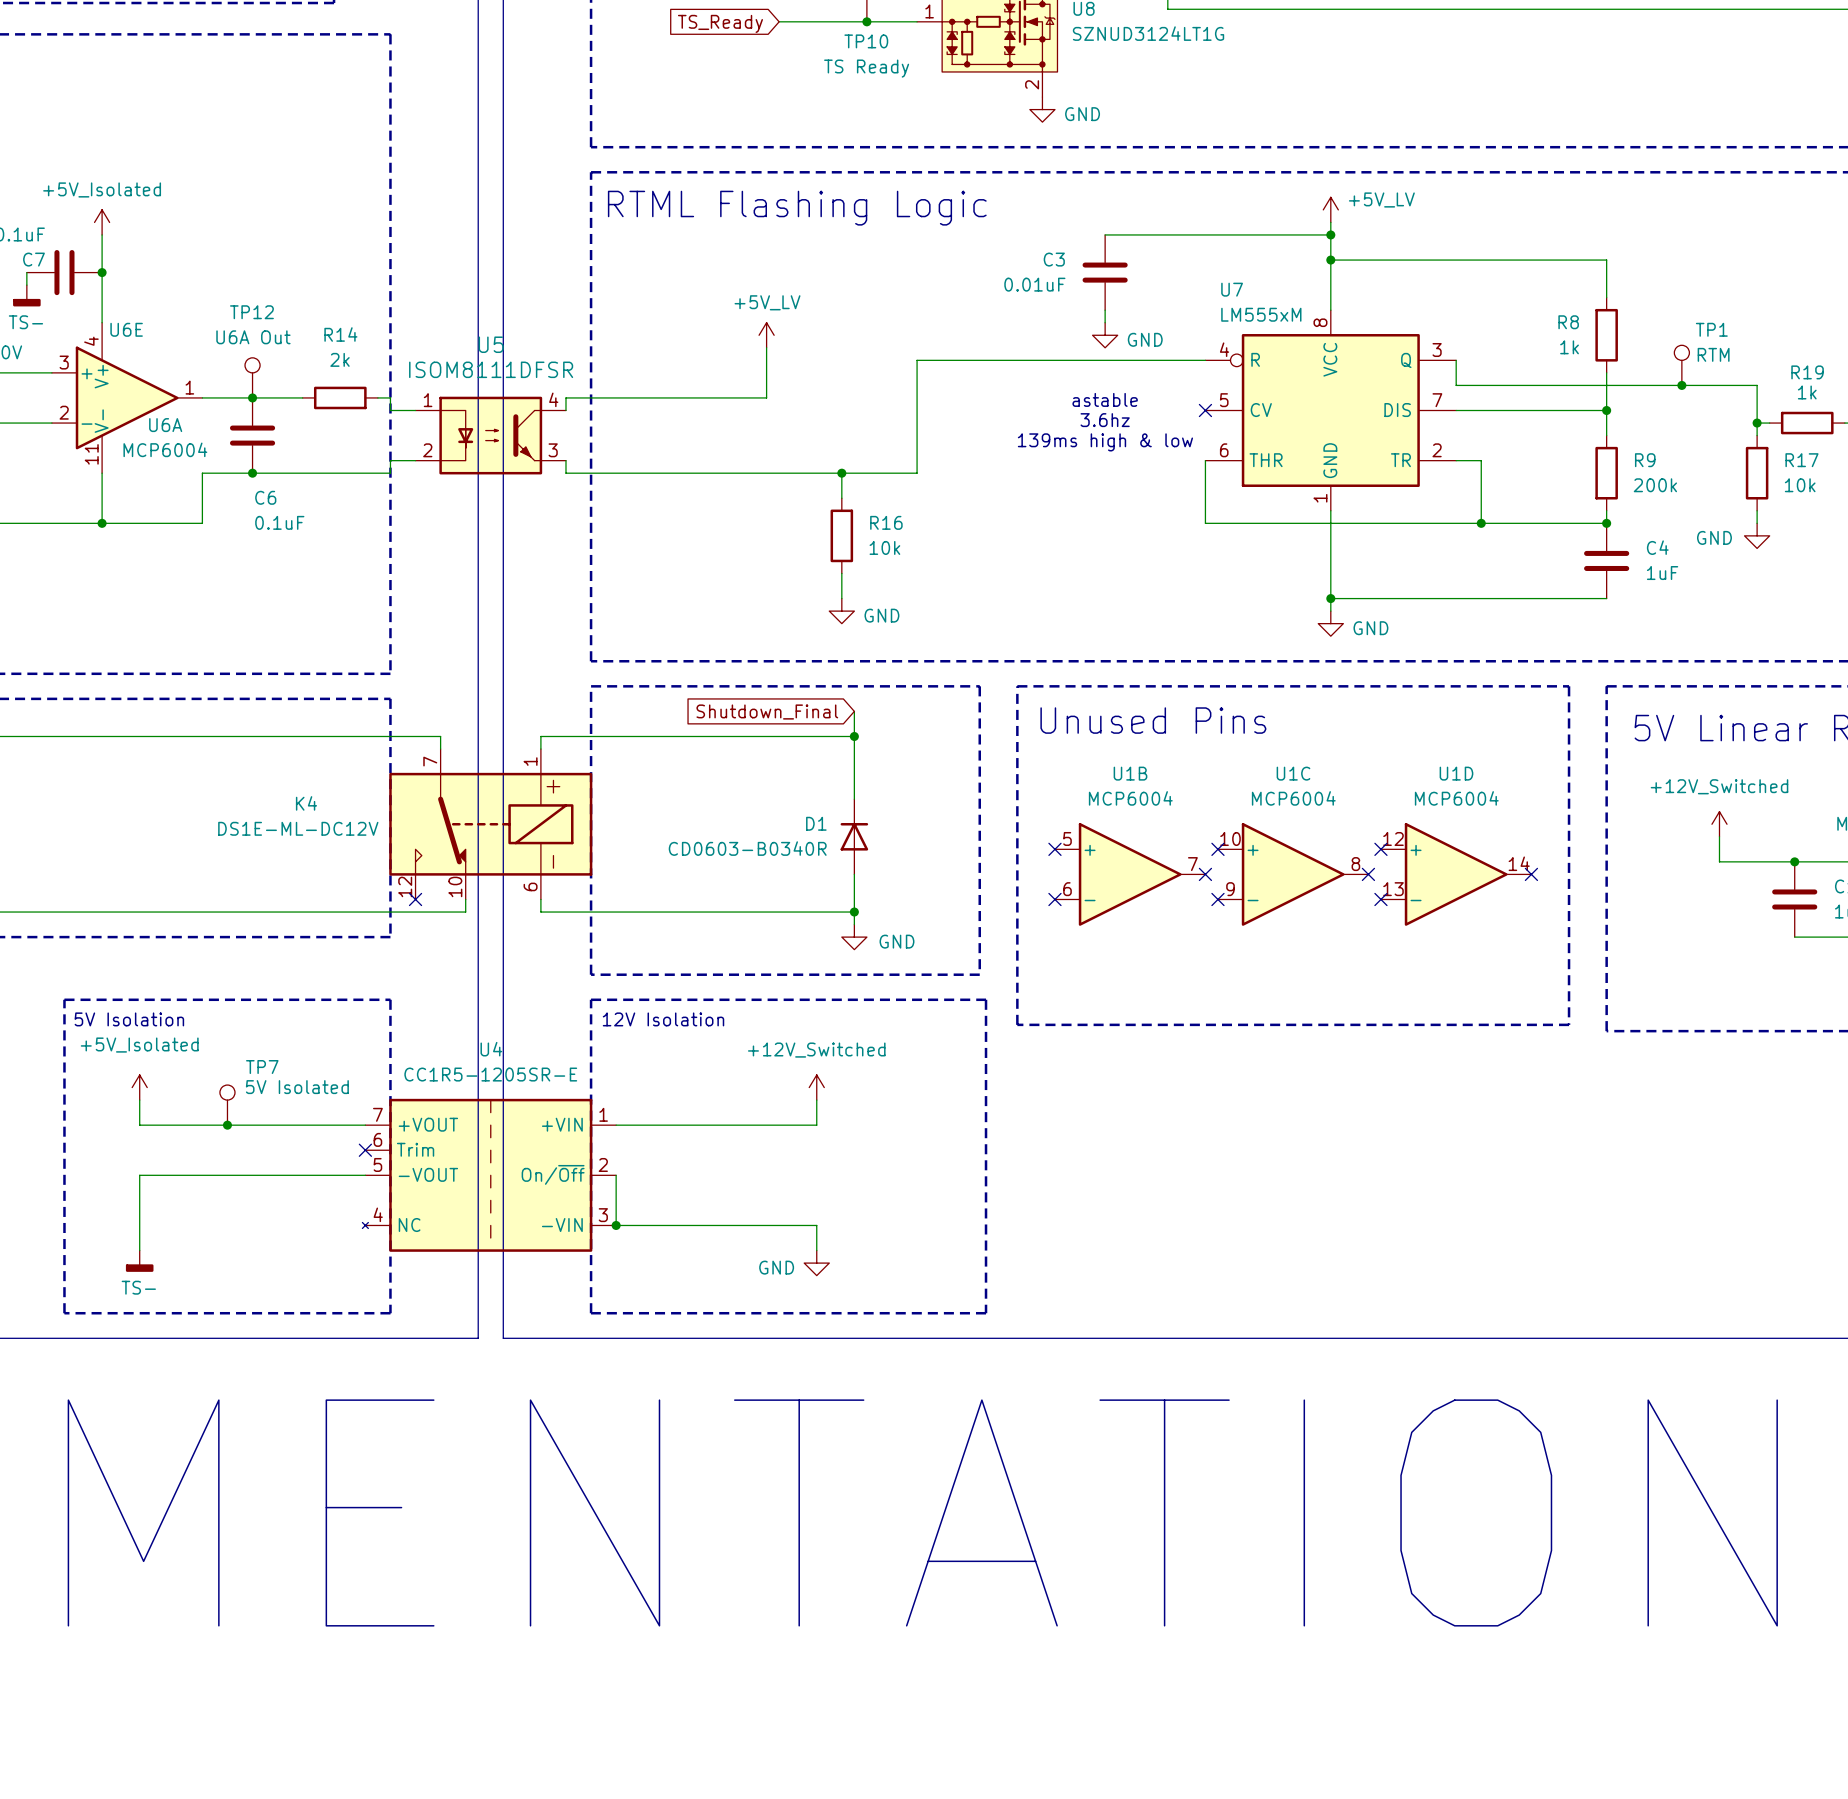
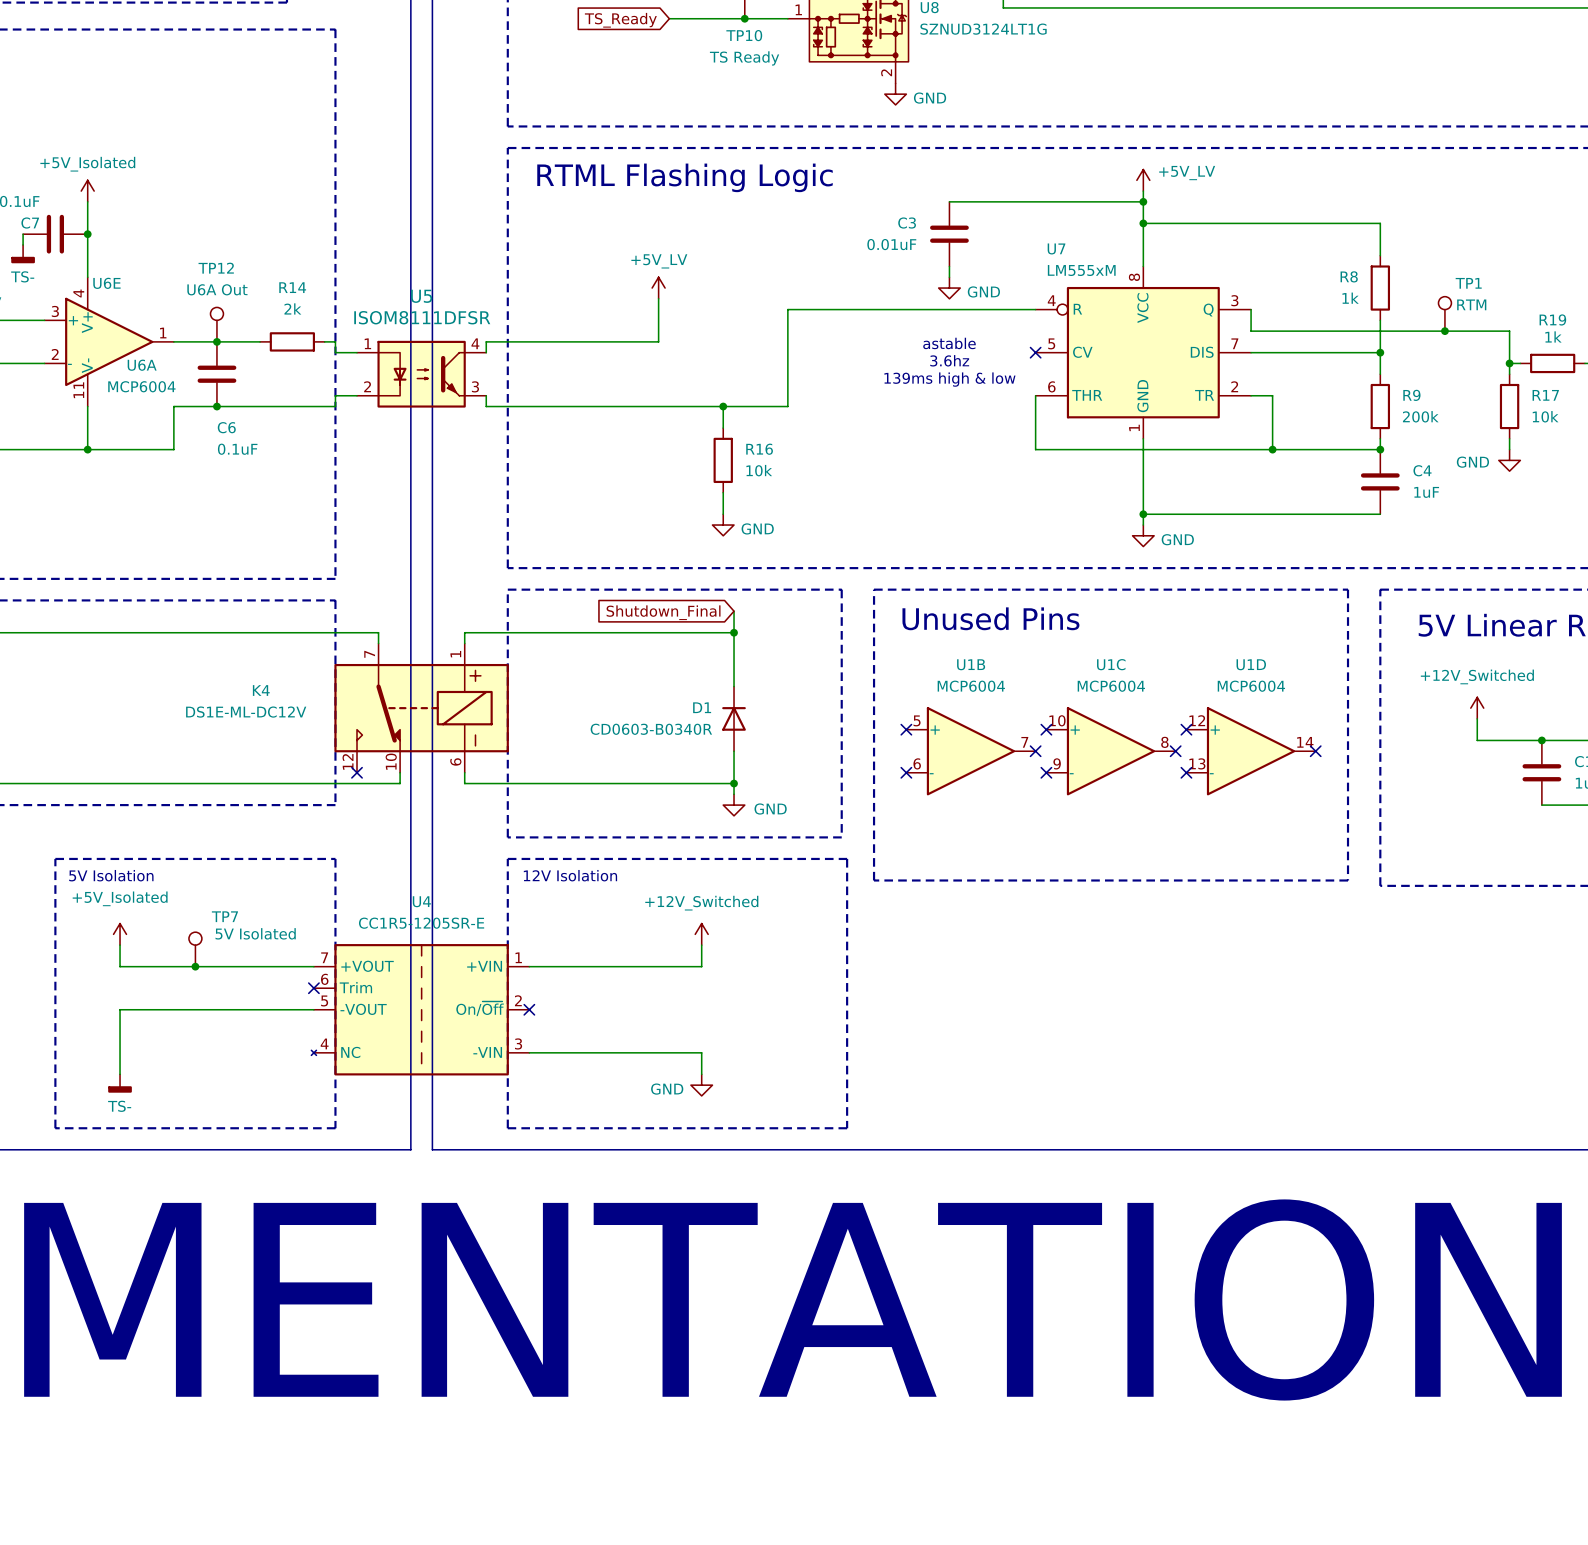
wire: (616, 1175) (616, 1225) -> none
no-connect mark: none -> (529, 1009)
junction: (616, 1225) -> none

